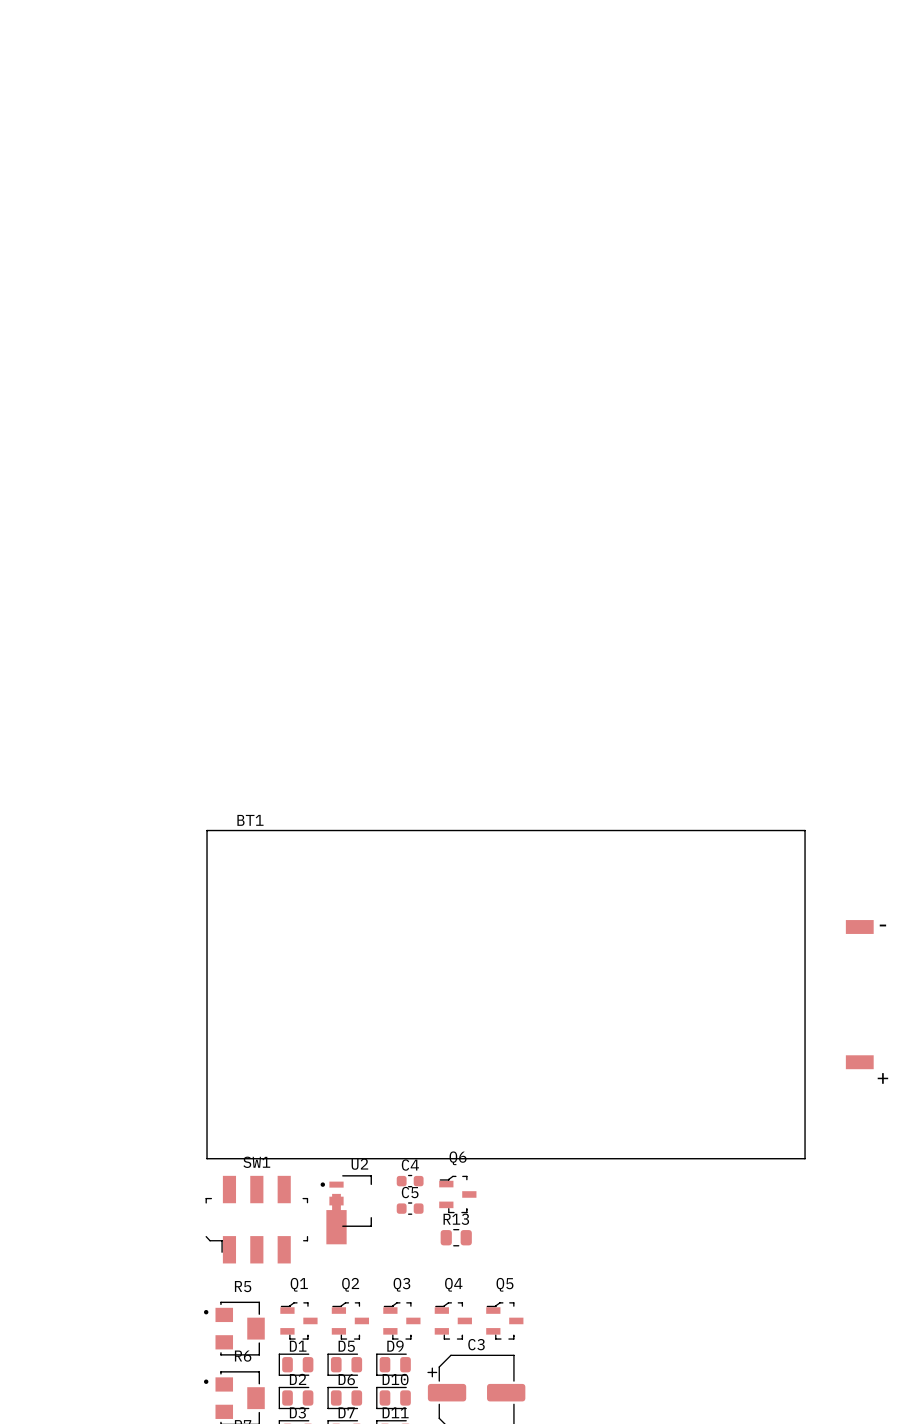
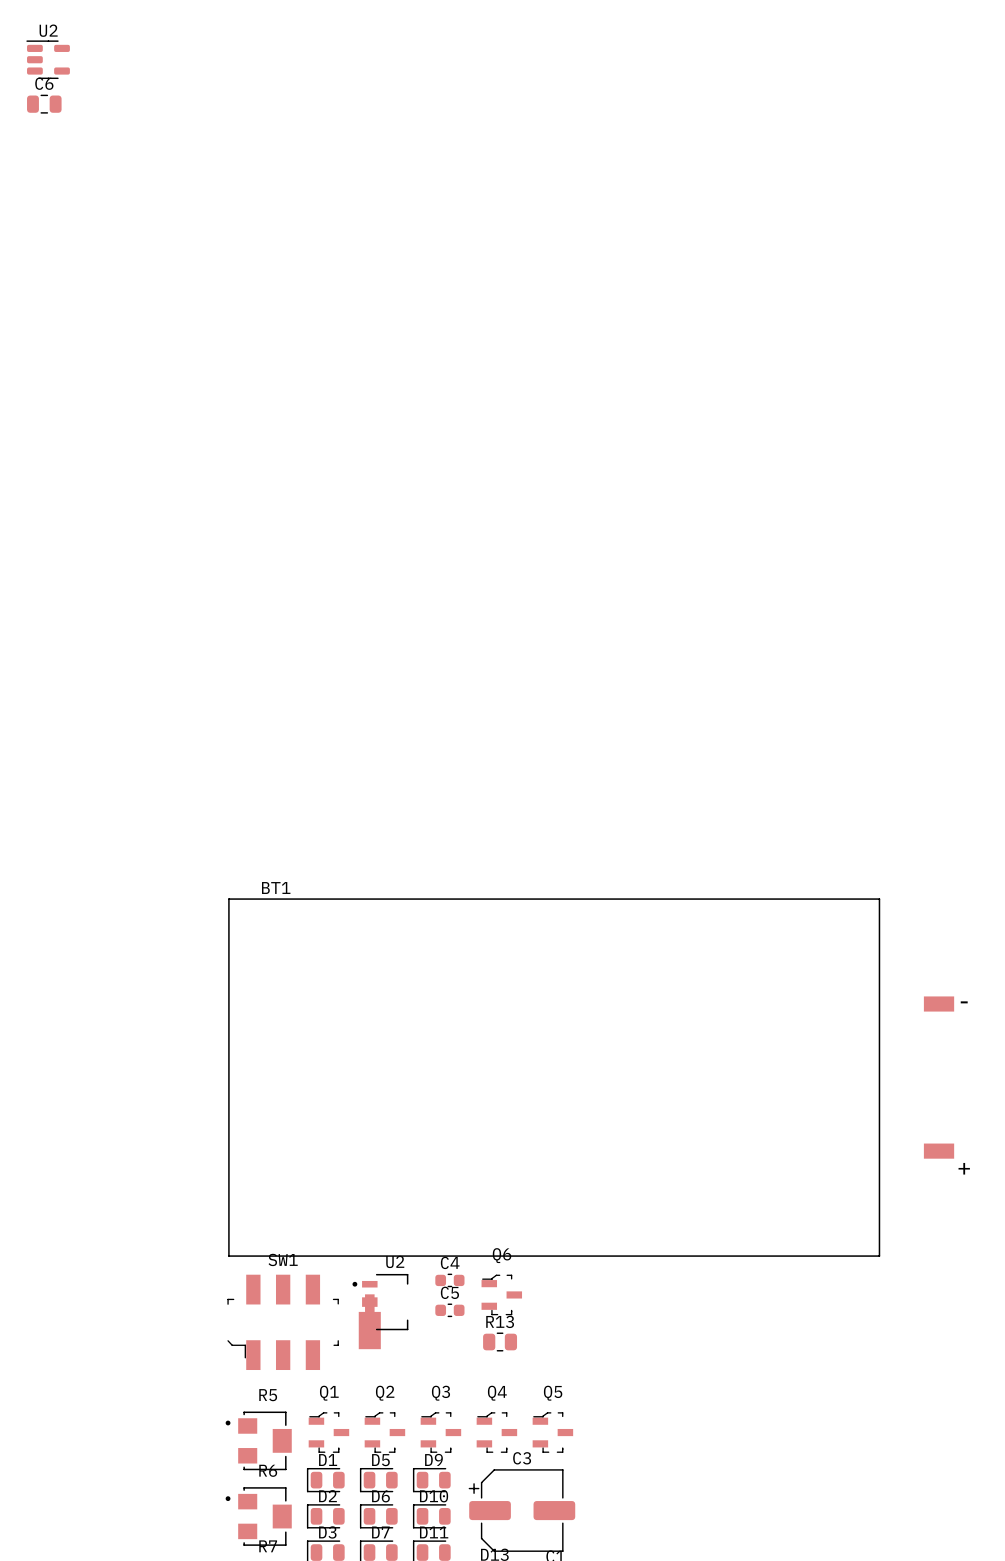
U2: none -> (48, 59)
C6: none -> (44, 104)

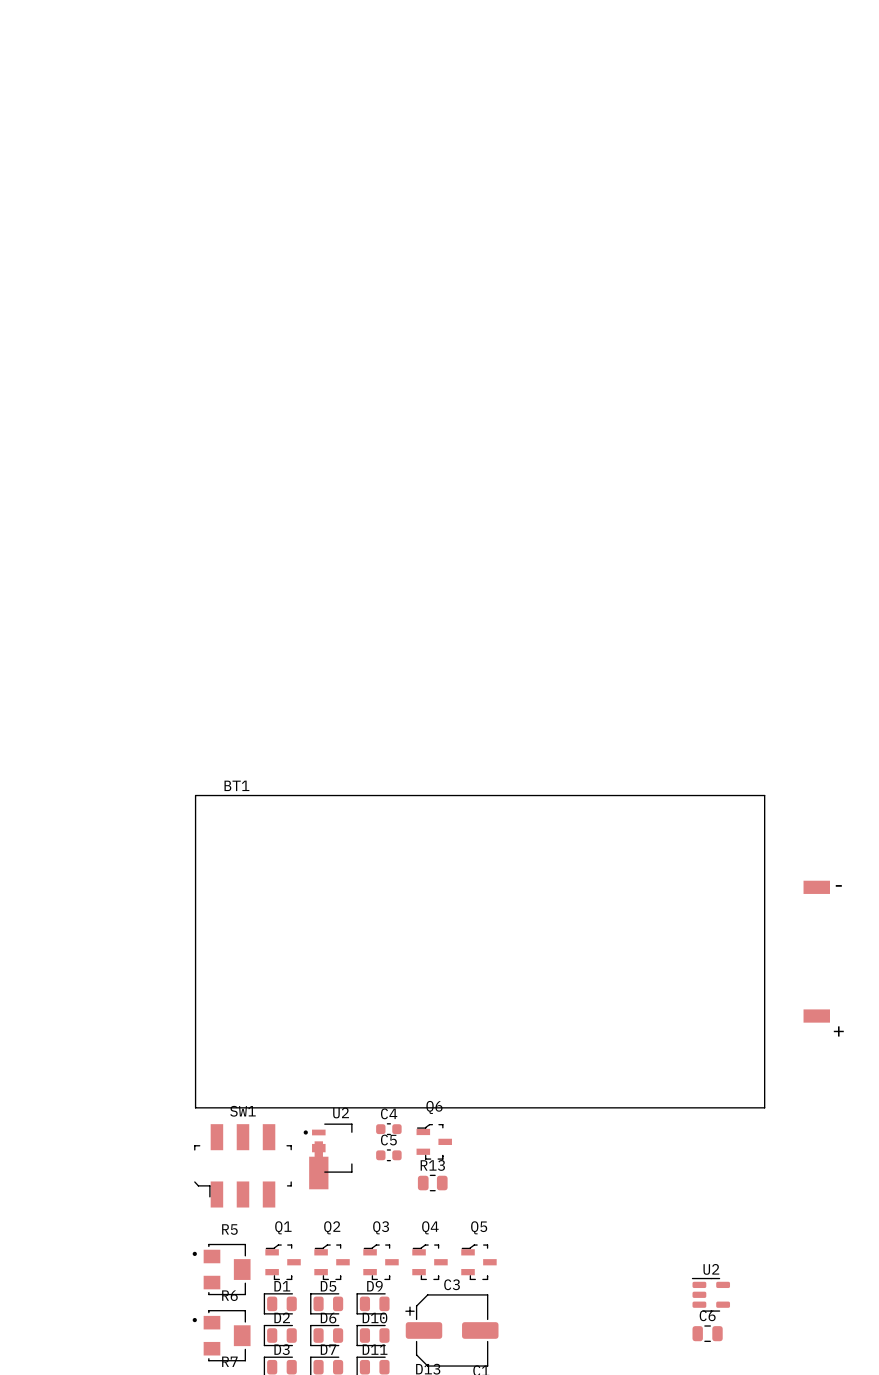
U2: (48, 59) -> none
C6 position: (44, 104) -> (707, 1333)
U2: none -> (710, 1294)

